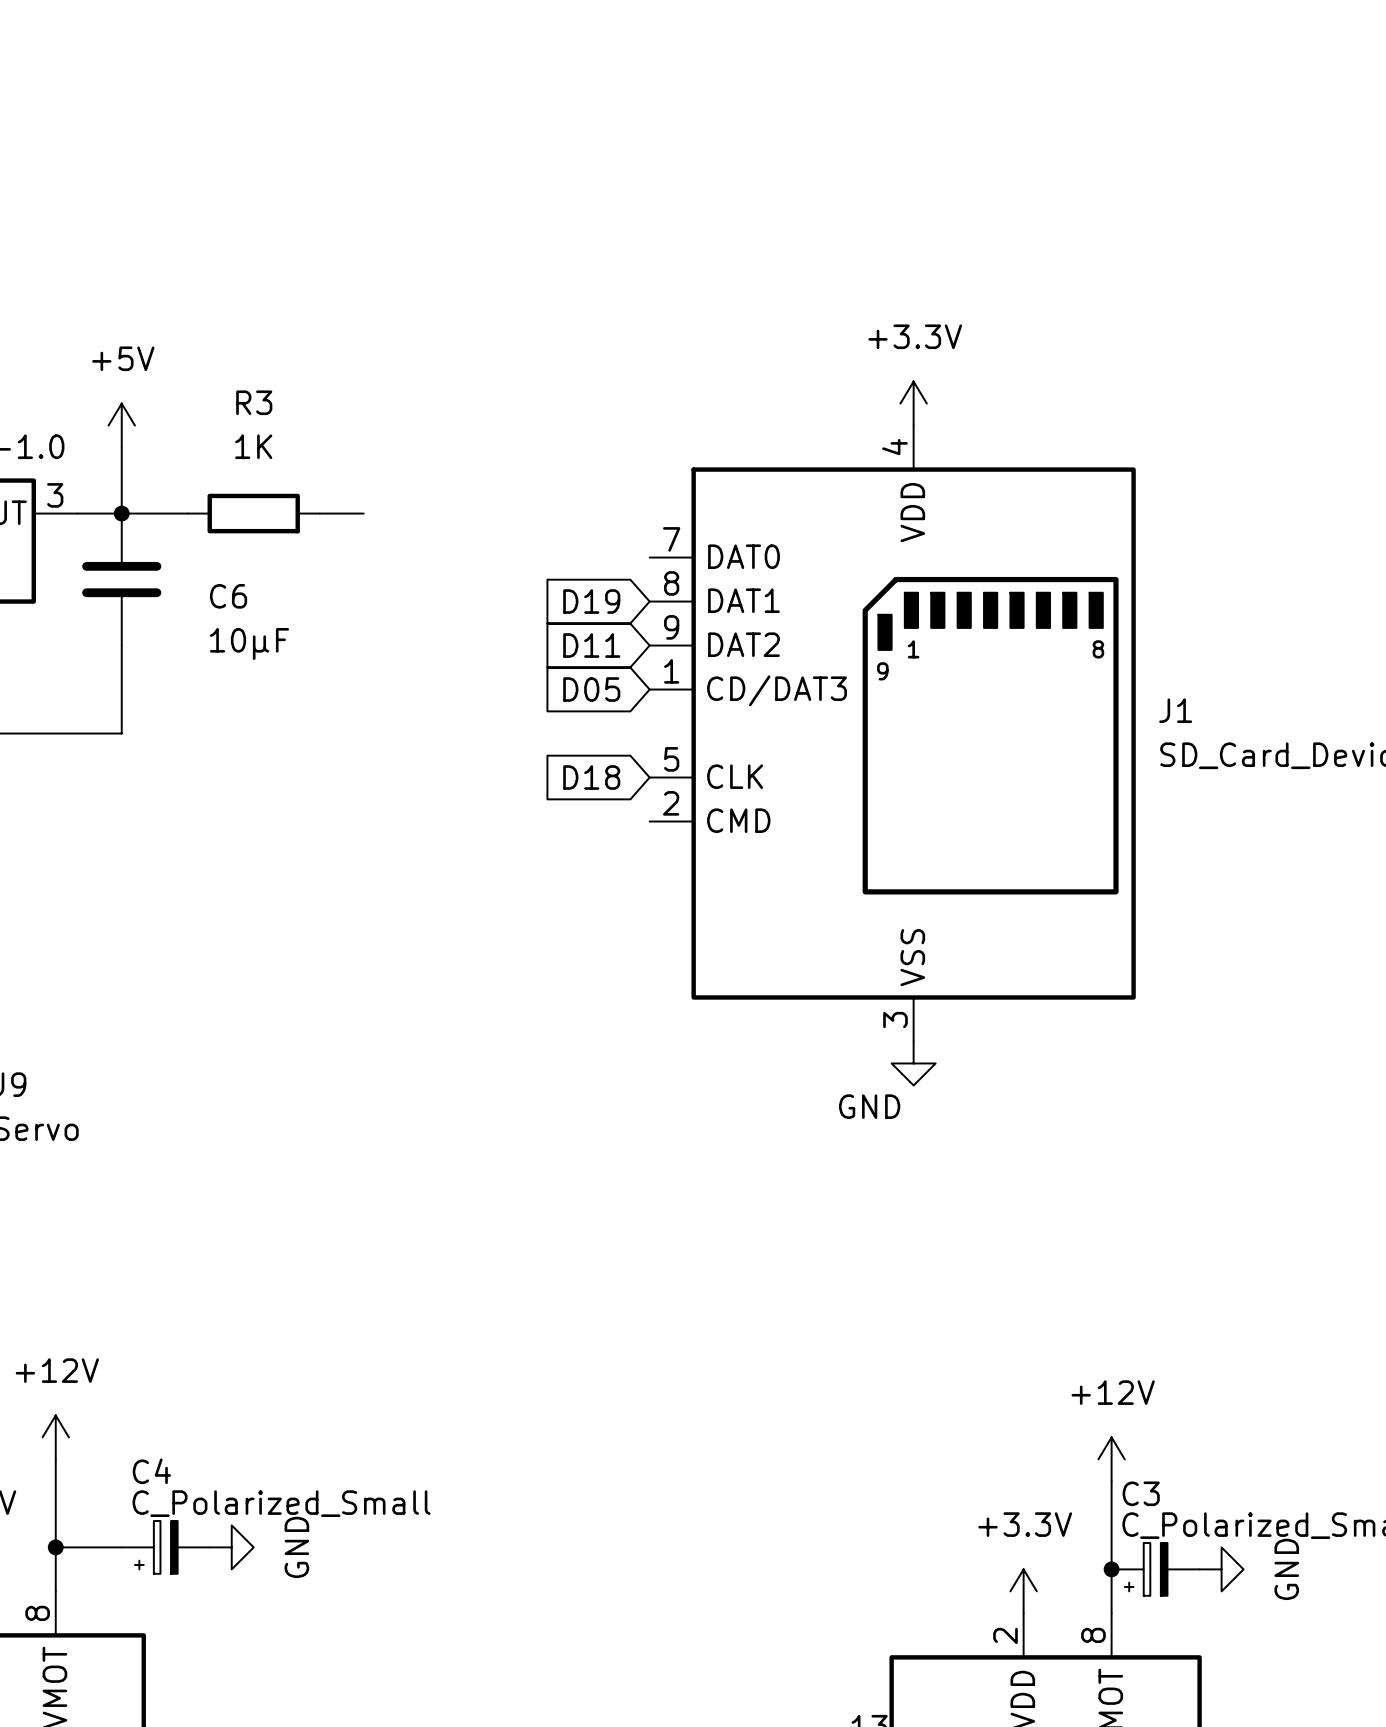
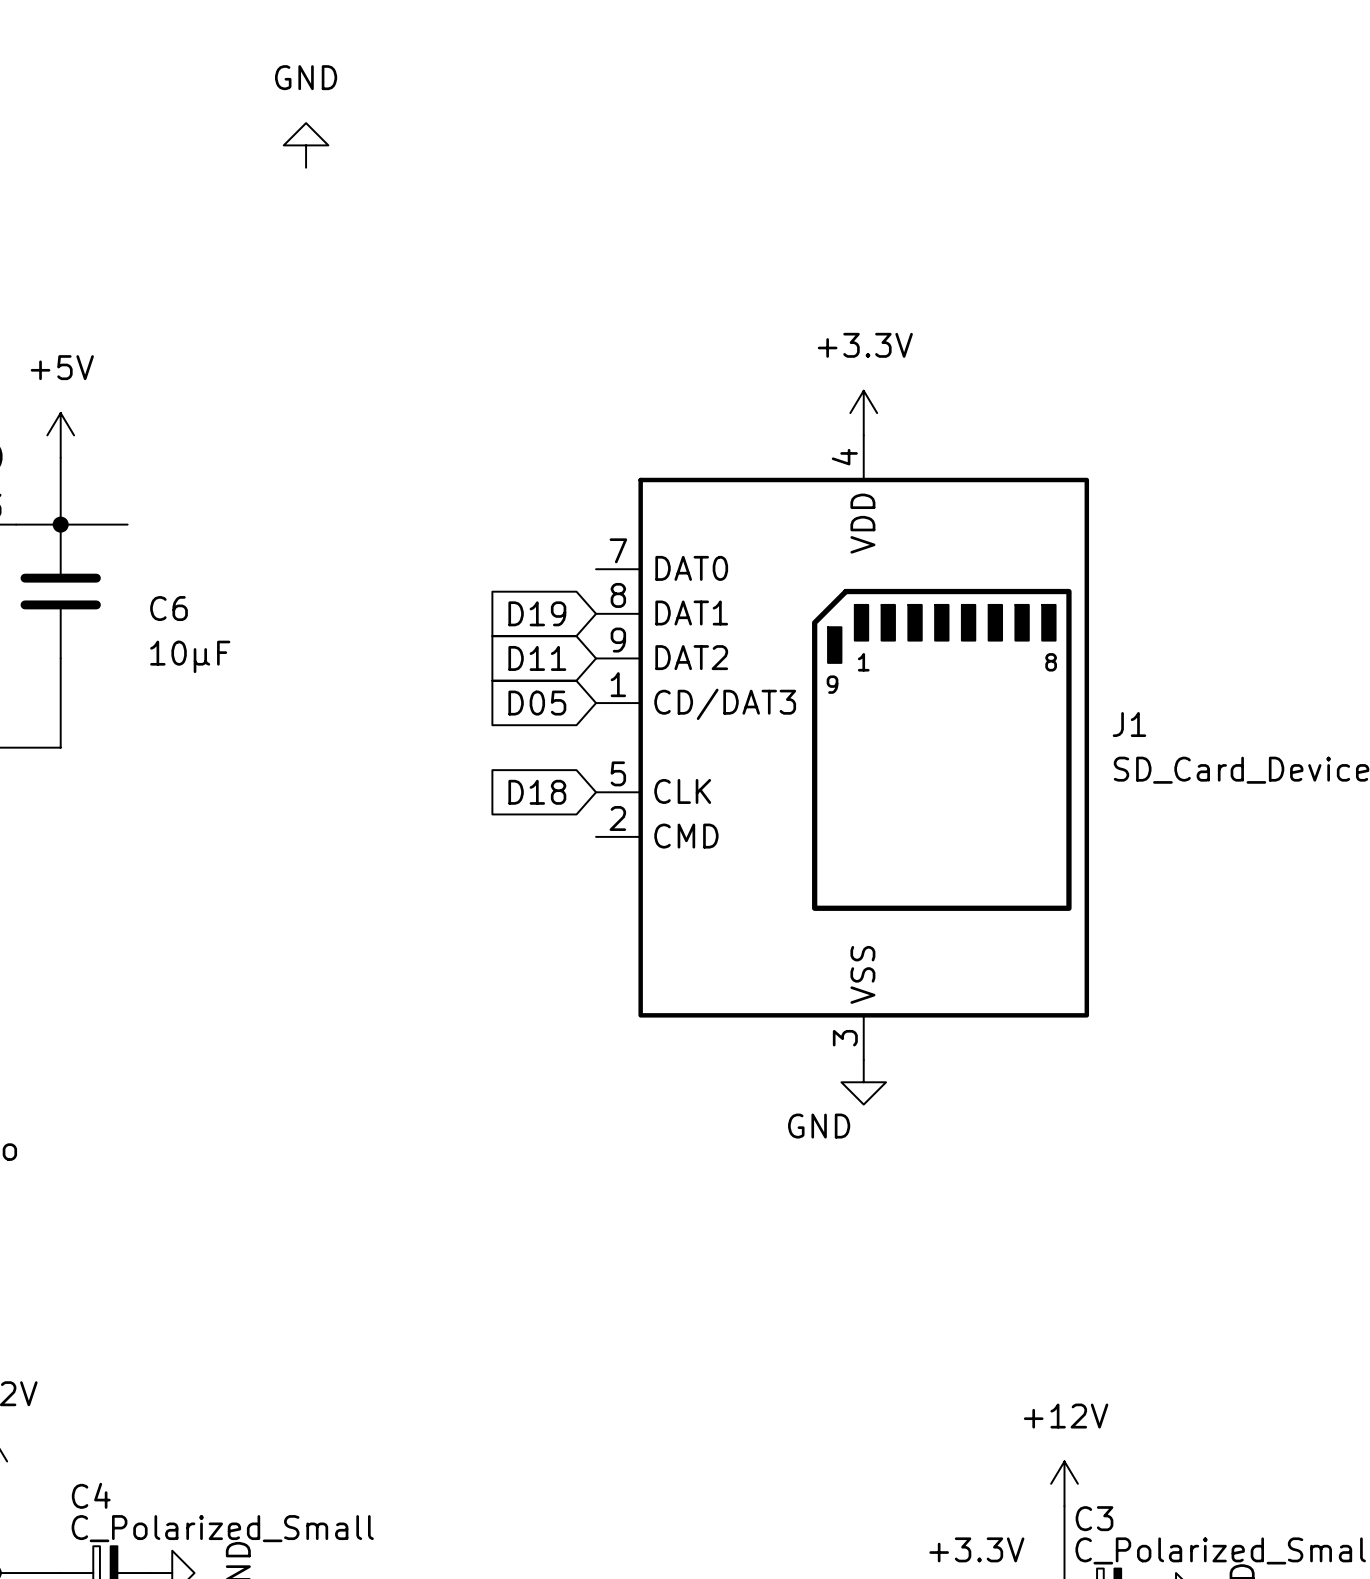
power symbol: none -> GND (306, 145)
R3: 1K (253, 513) -> none
wire: (319, 513) (363, 513) -> none

